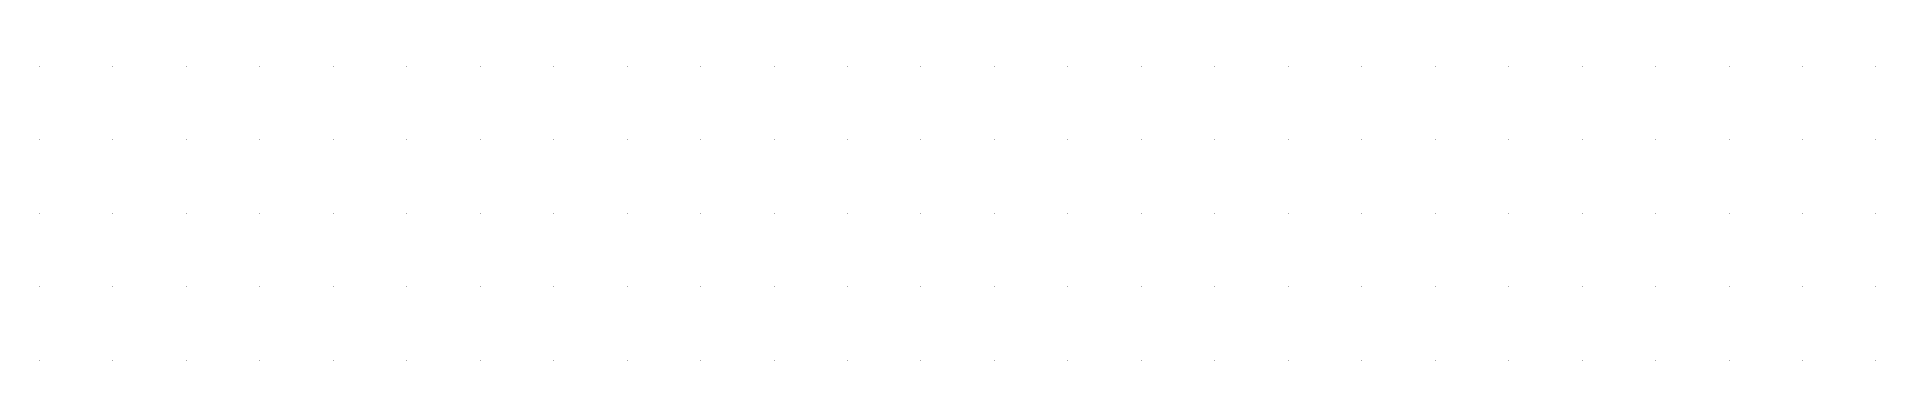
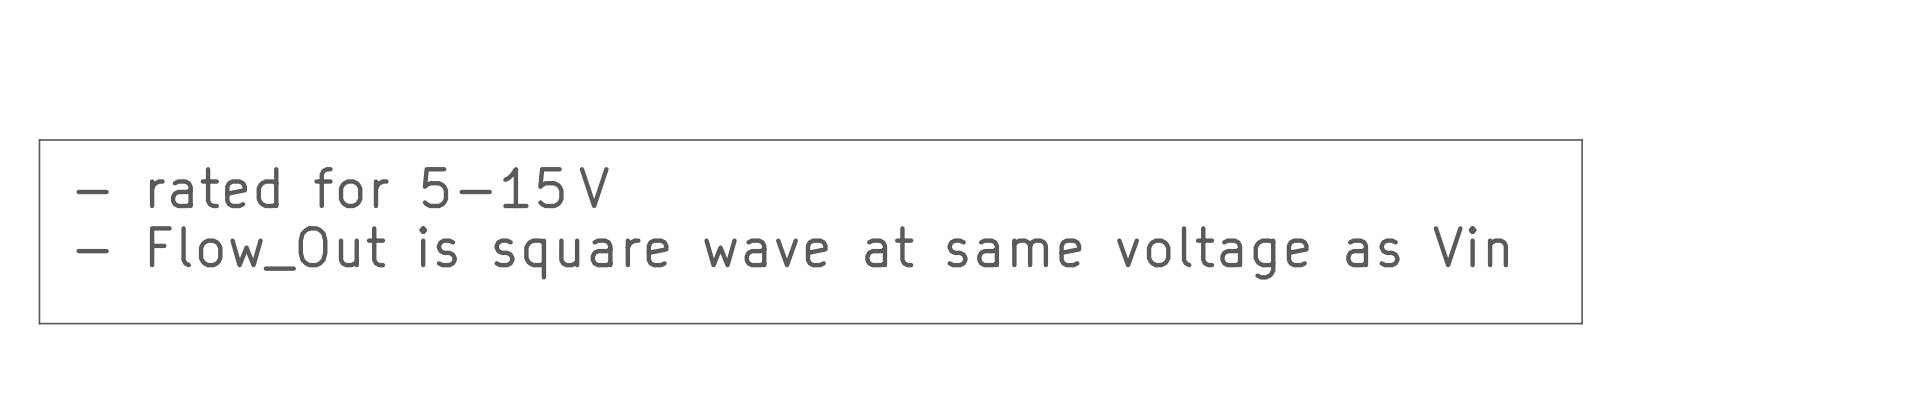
line: none -> (39, 139) (1582, 139) (1582, 323) (39, 323) (39, 139)
text: none -> - rated for 5-15 V (342, 187)
text: none -> - Flow_Out is square wave at same voltage as Vin (792, 252)

